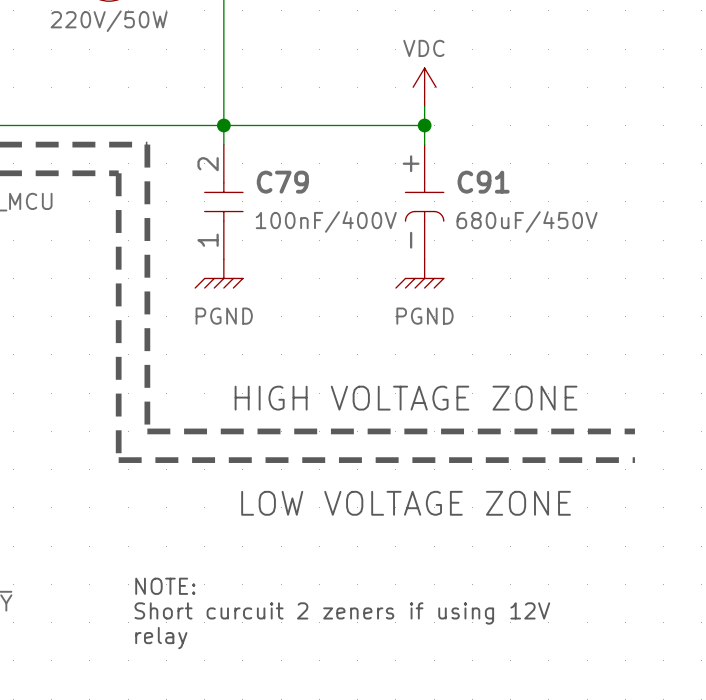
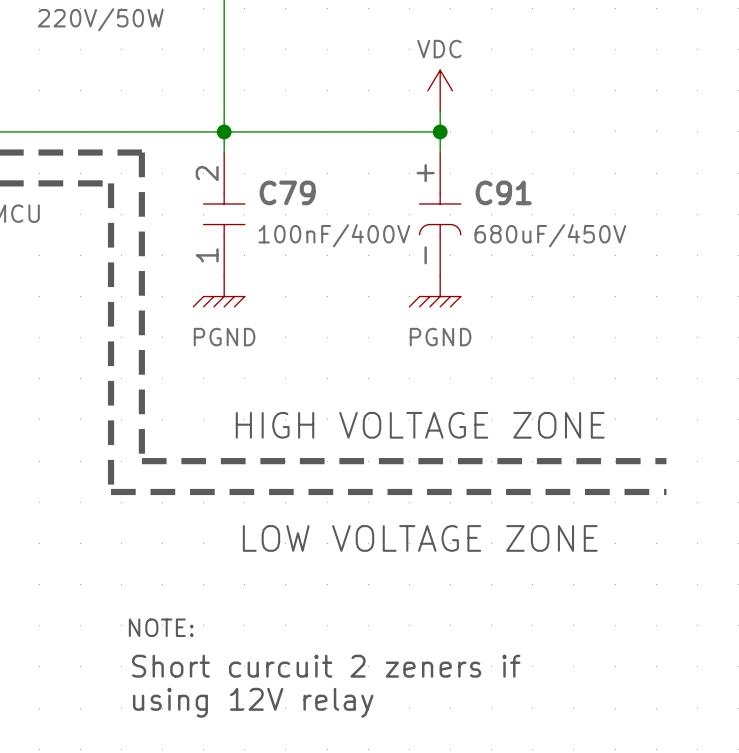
text: Short curcuit 2 zeners if using 12V (342, 613) -> Short curcuit 2 zeners if (326, 666)
text: relay (161, 638) -> none
text: none -> using 12V relay (253, 702)

